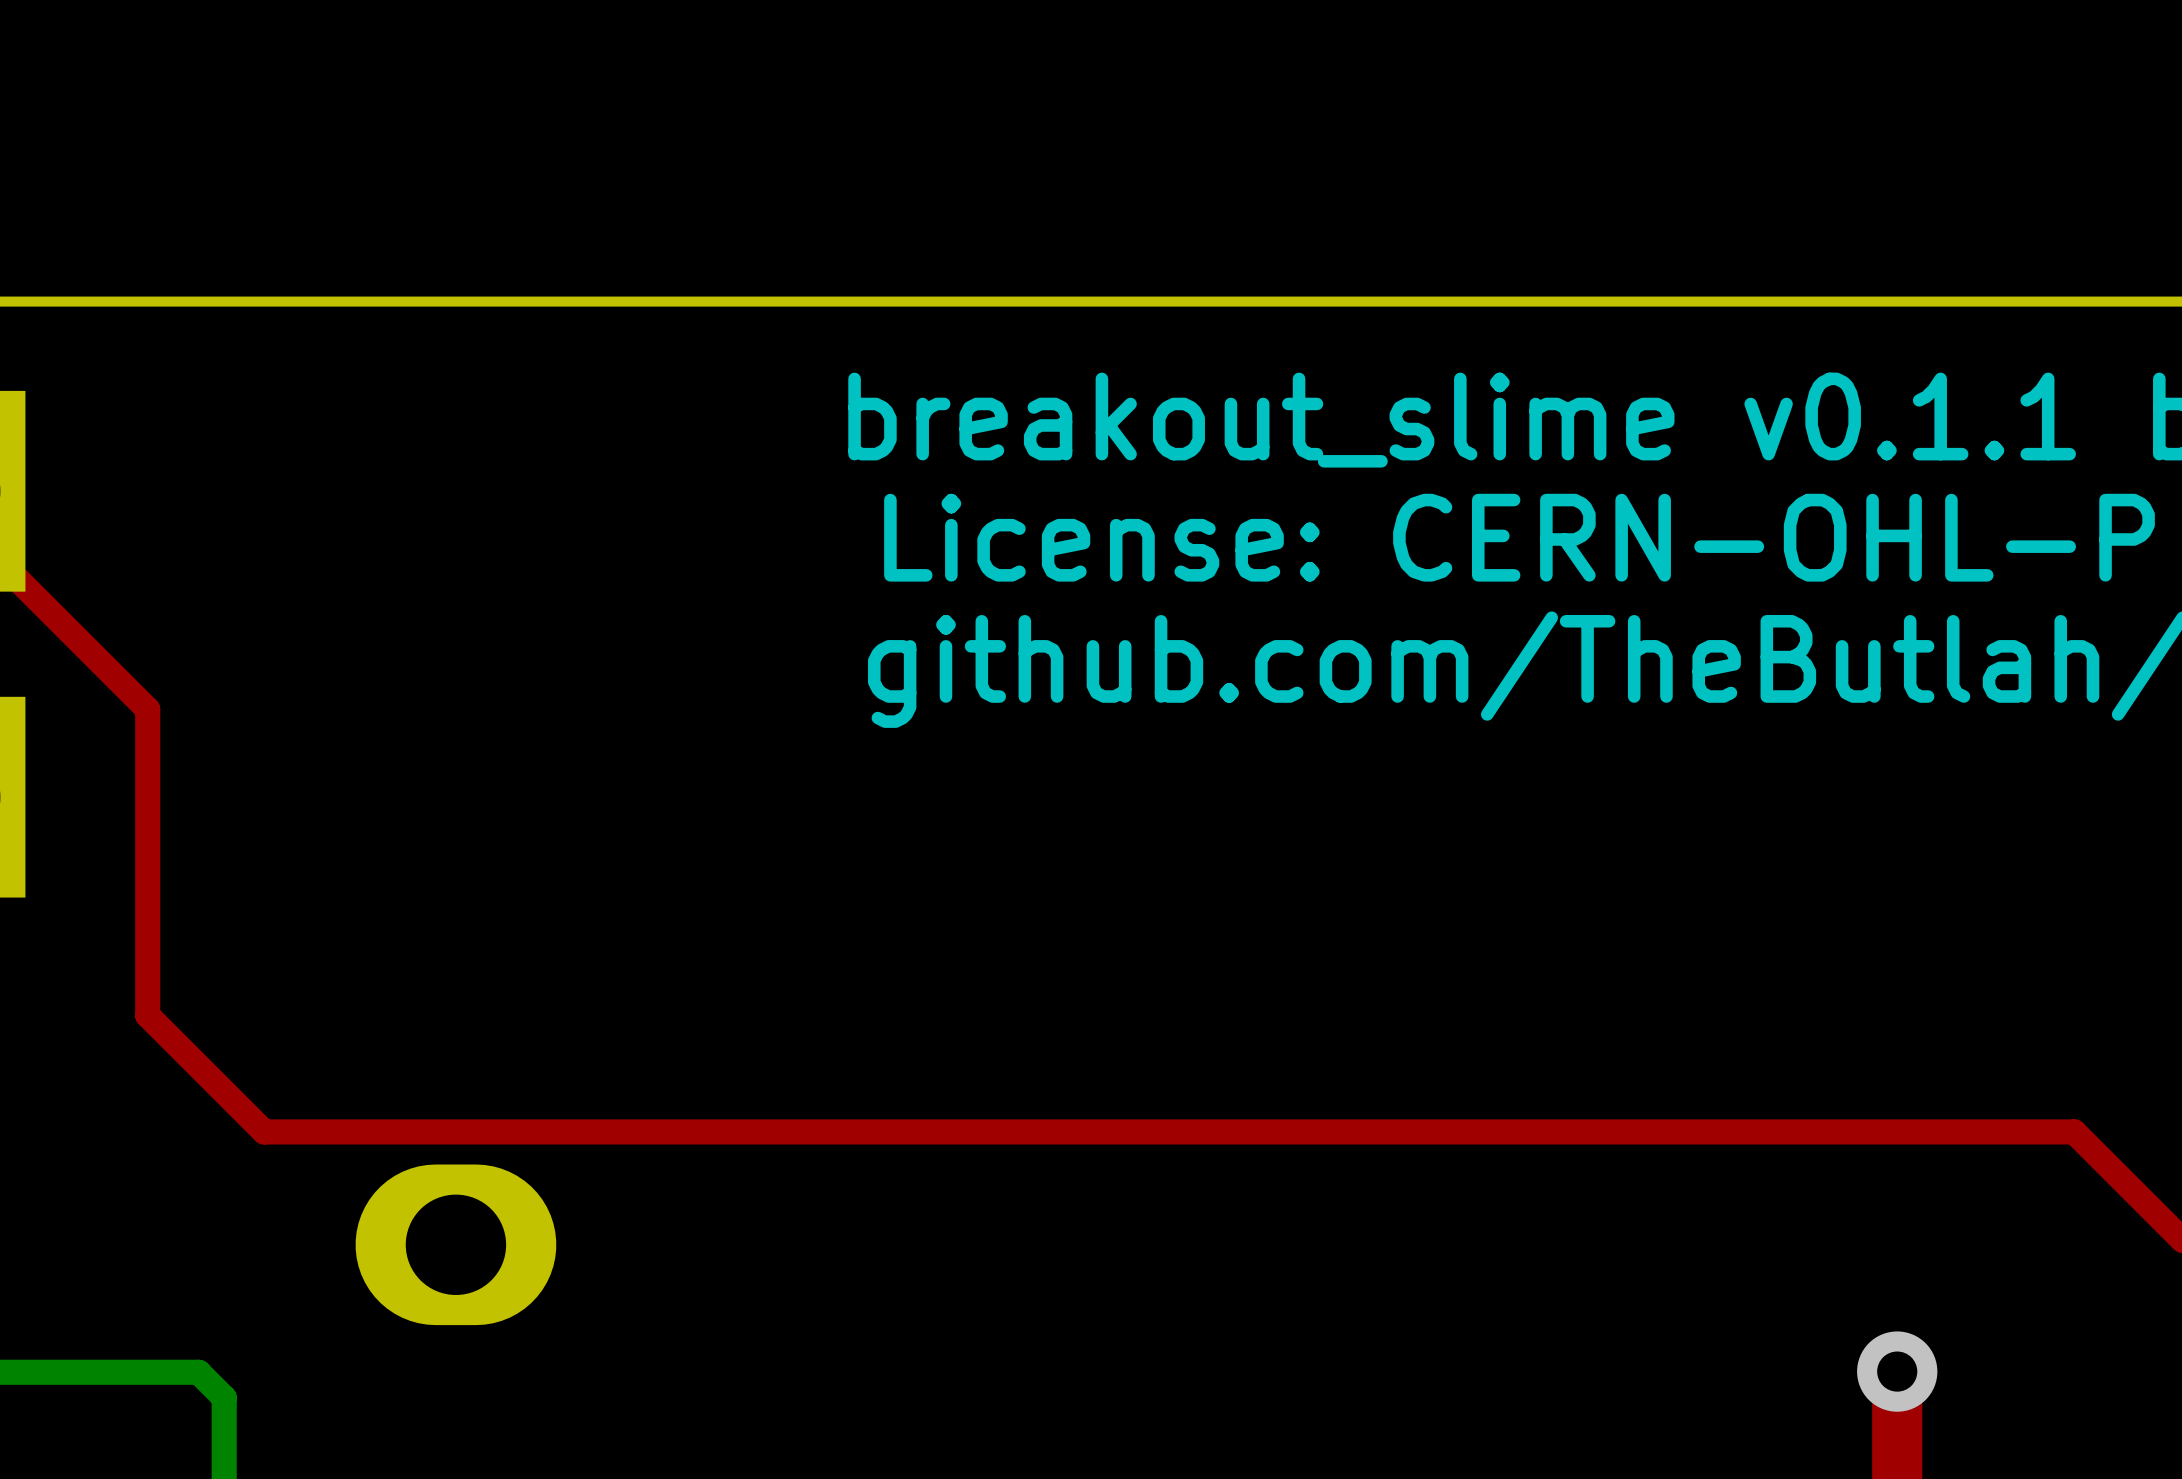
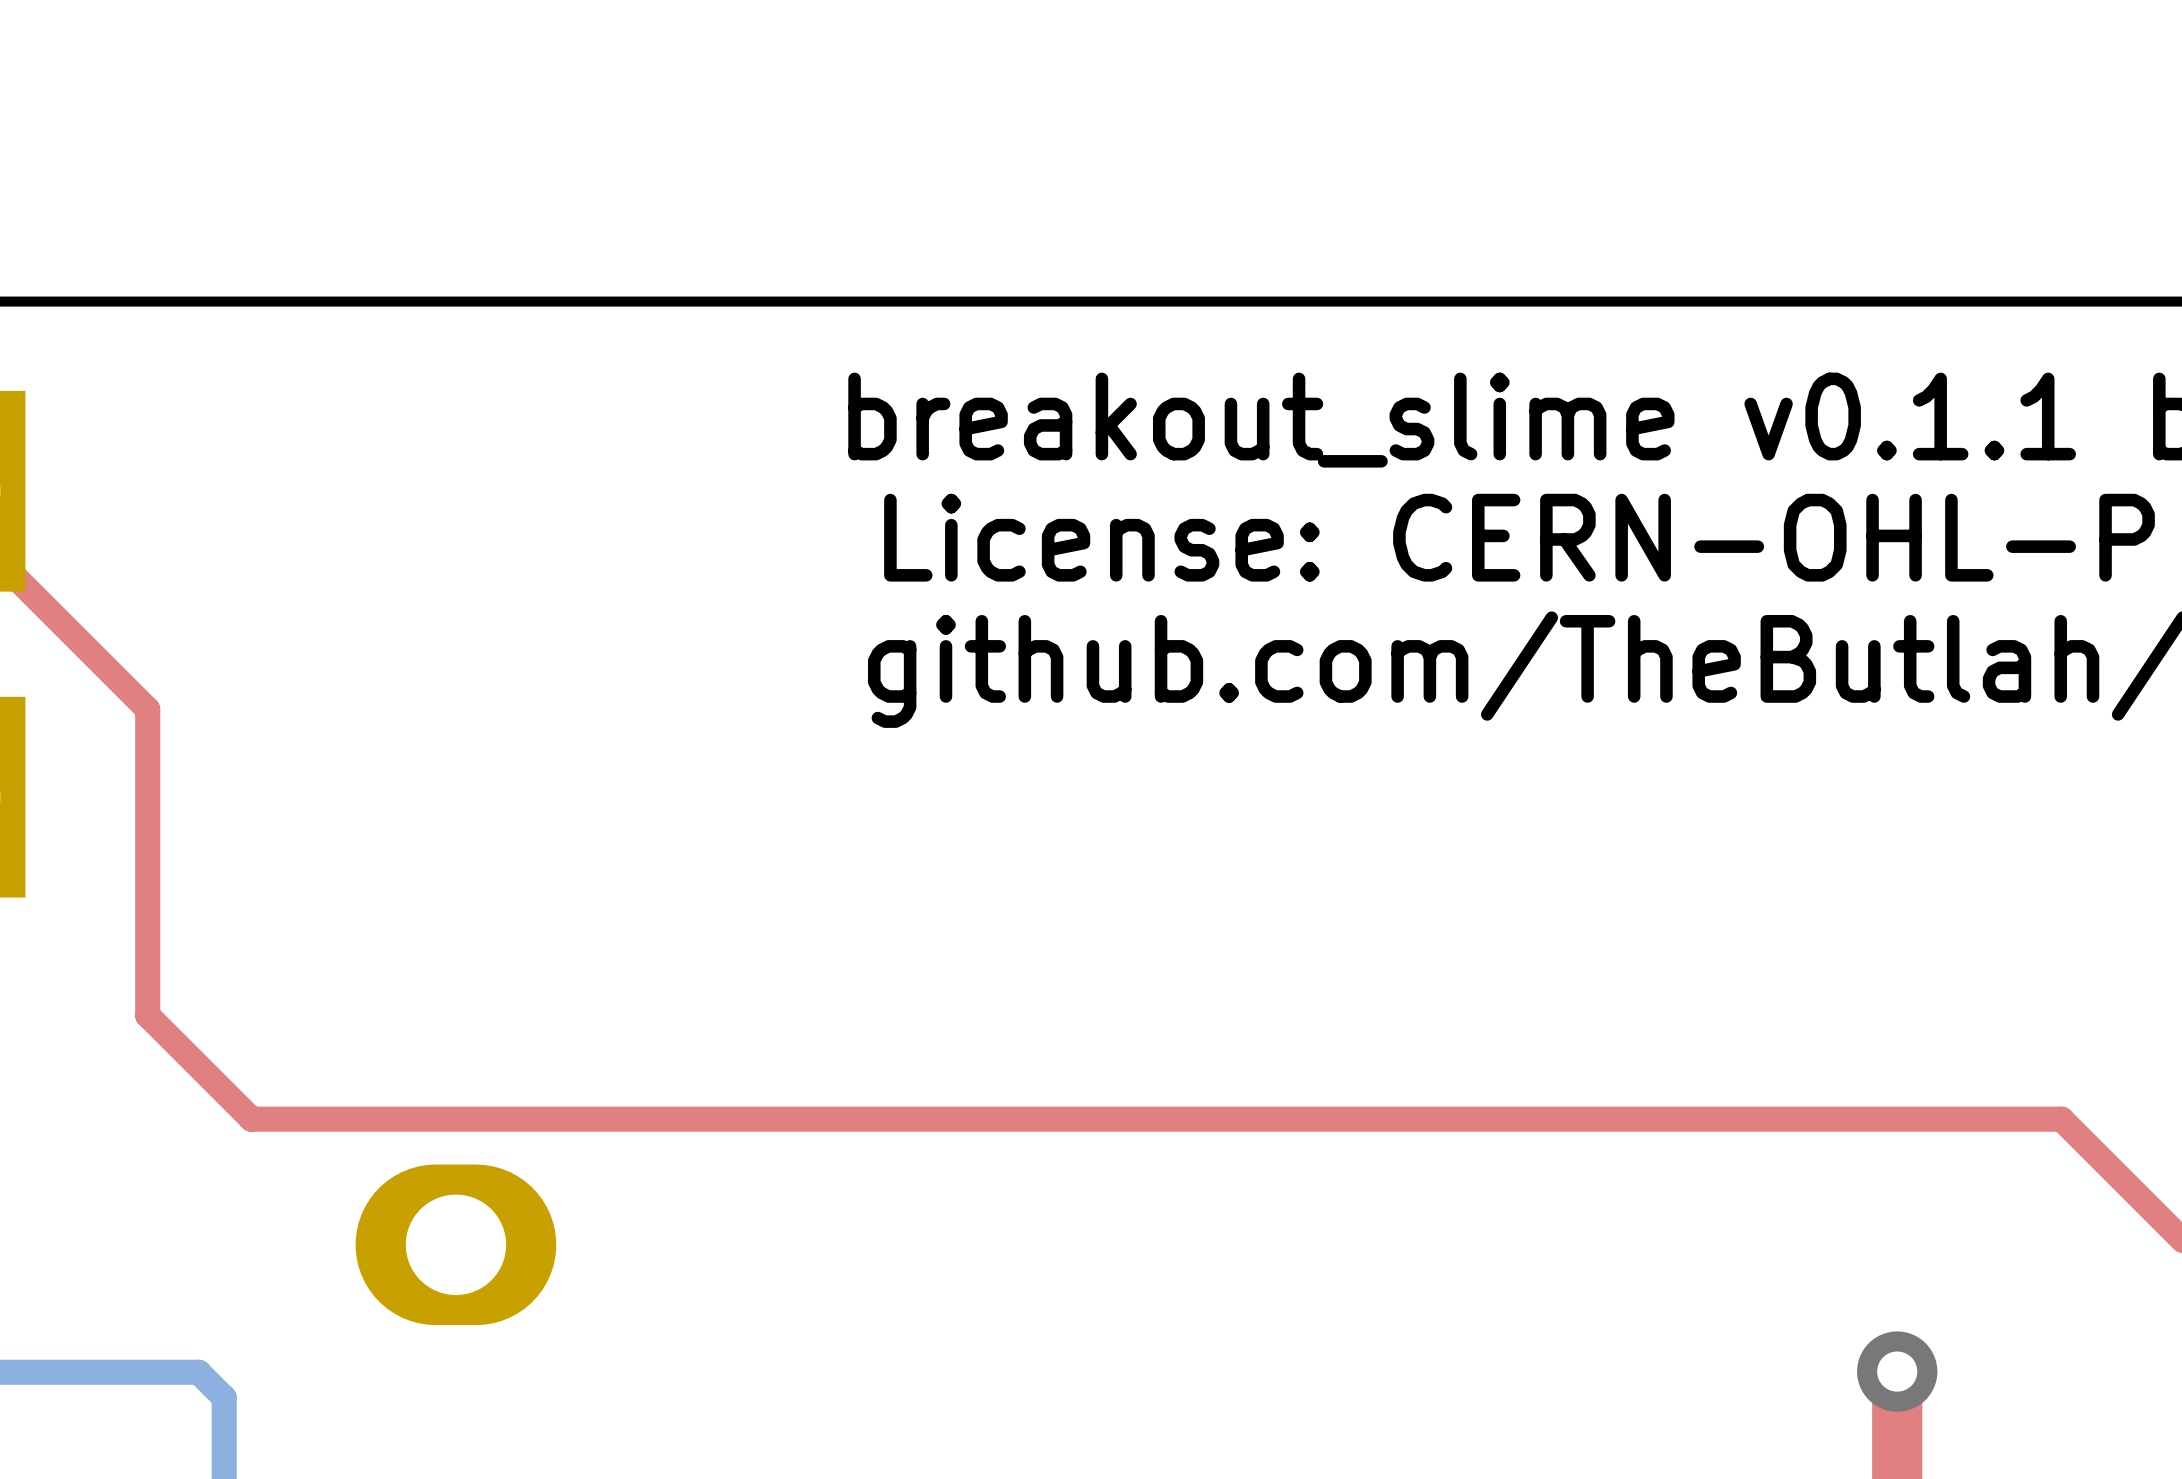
top track: (251, 1119) (264, 1131) (2074, 1131) -> (251, 1119) (2061, 1119) (2074, 1131)

